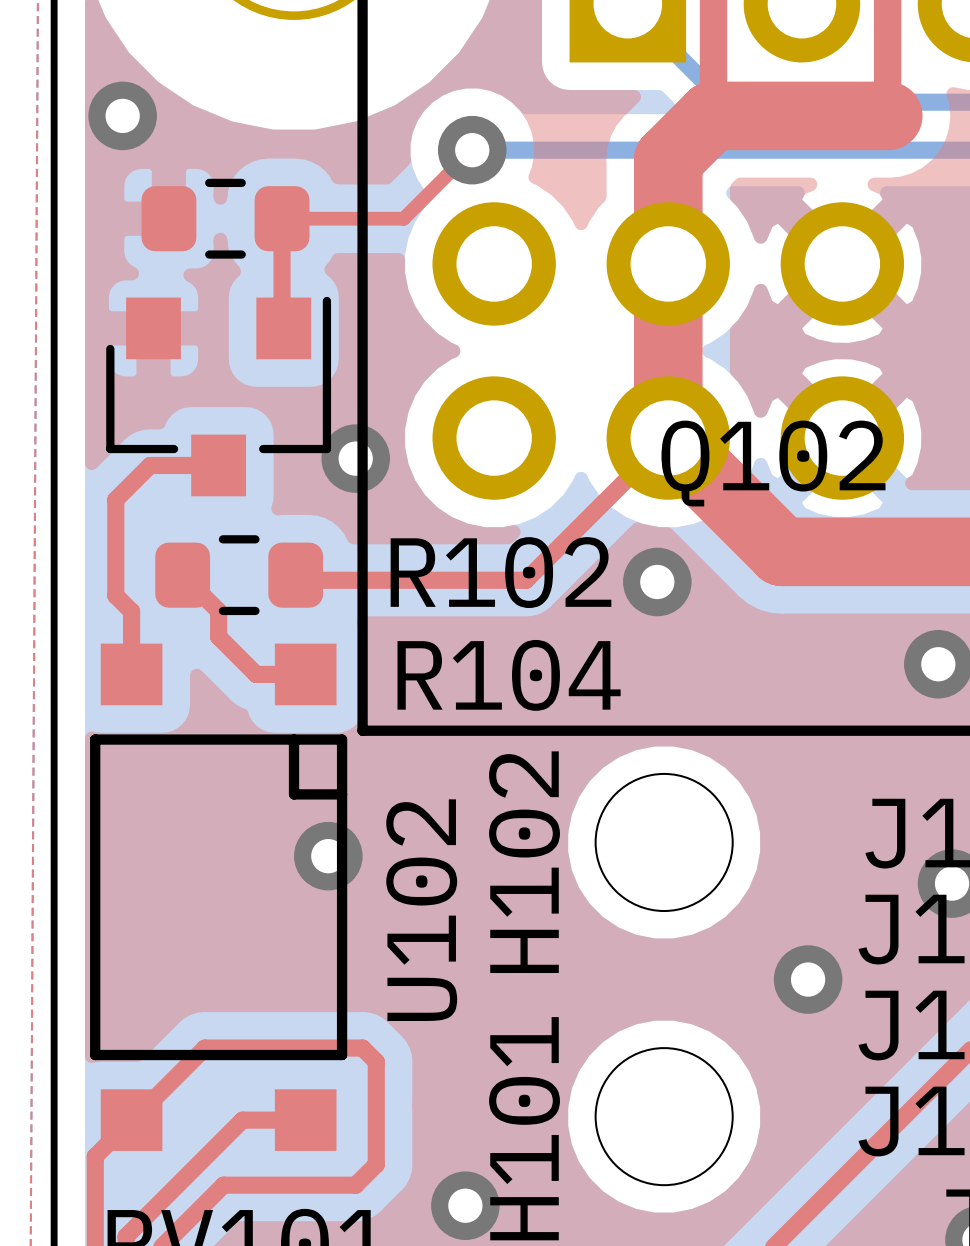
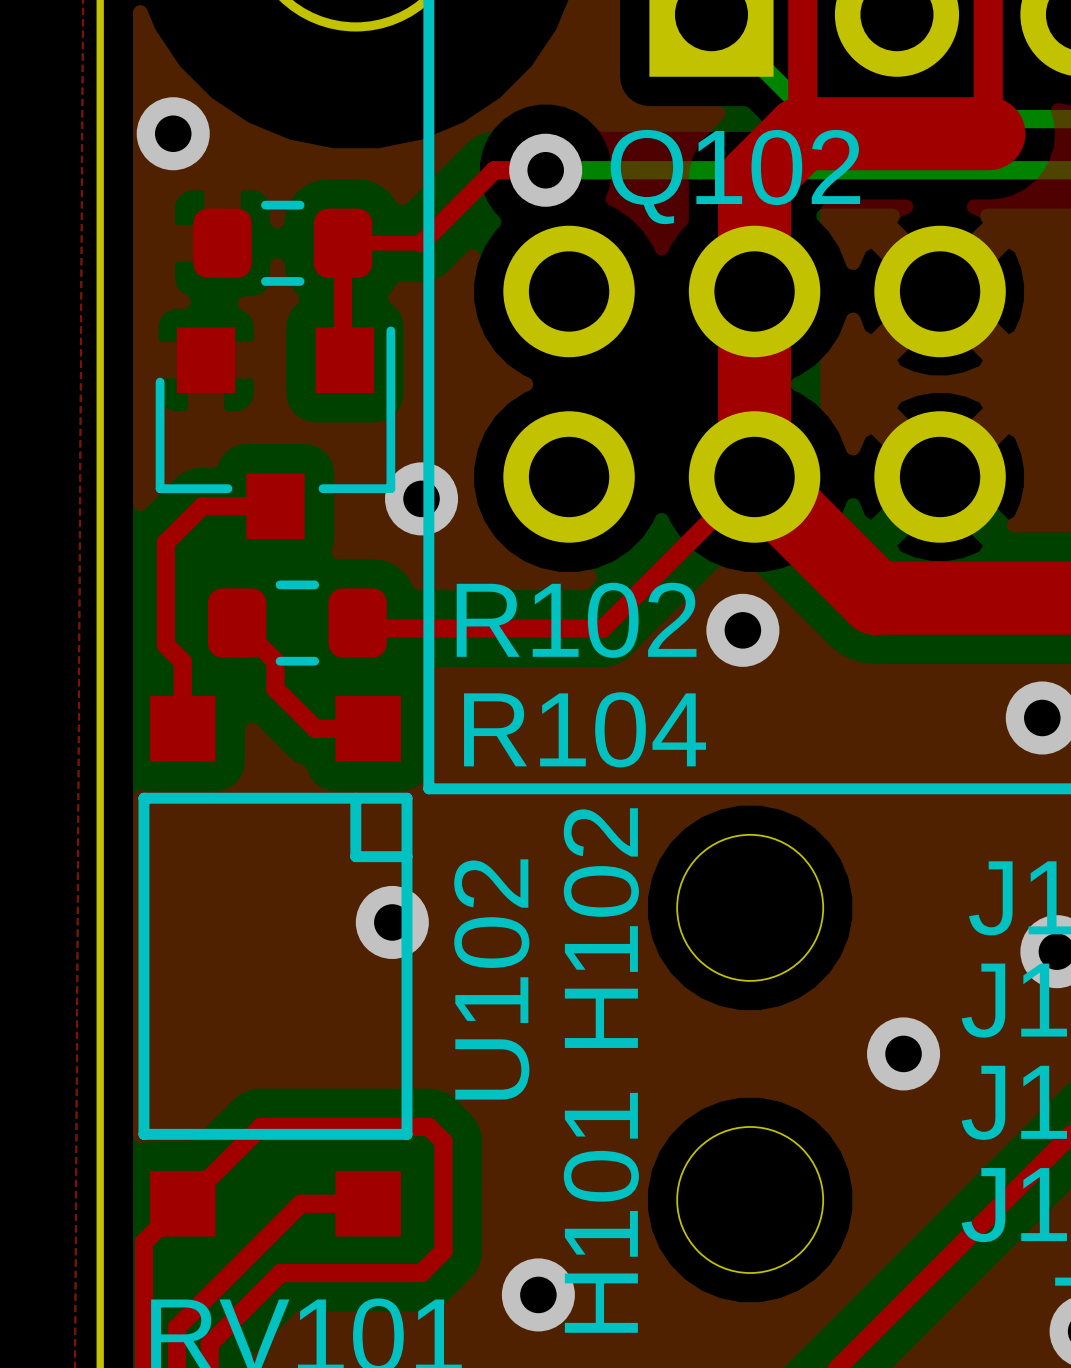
top track: (472, 150) (403, 218) (355, 218) -> (545, 170) (494, 170) (421, 243)
Q102 name position: Q102 (773, 463) -> Q102 (735, 177)

